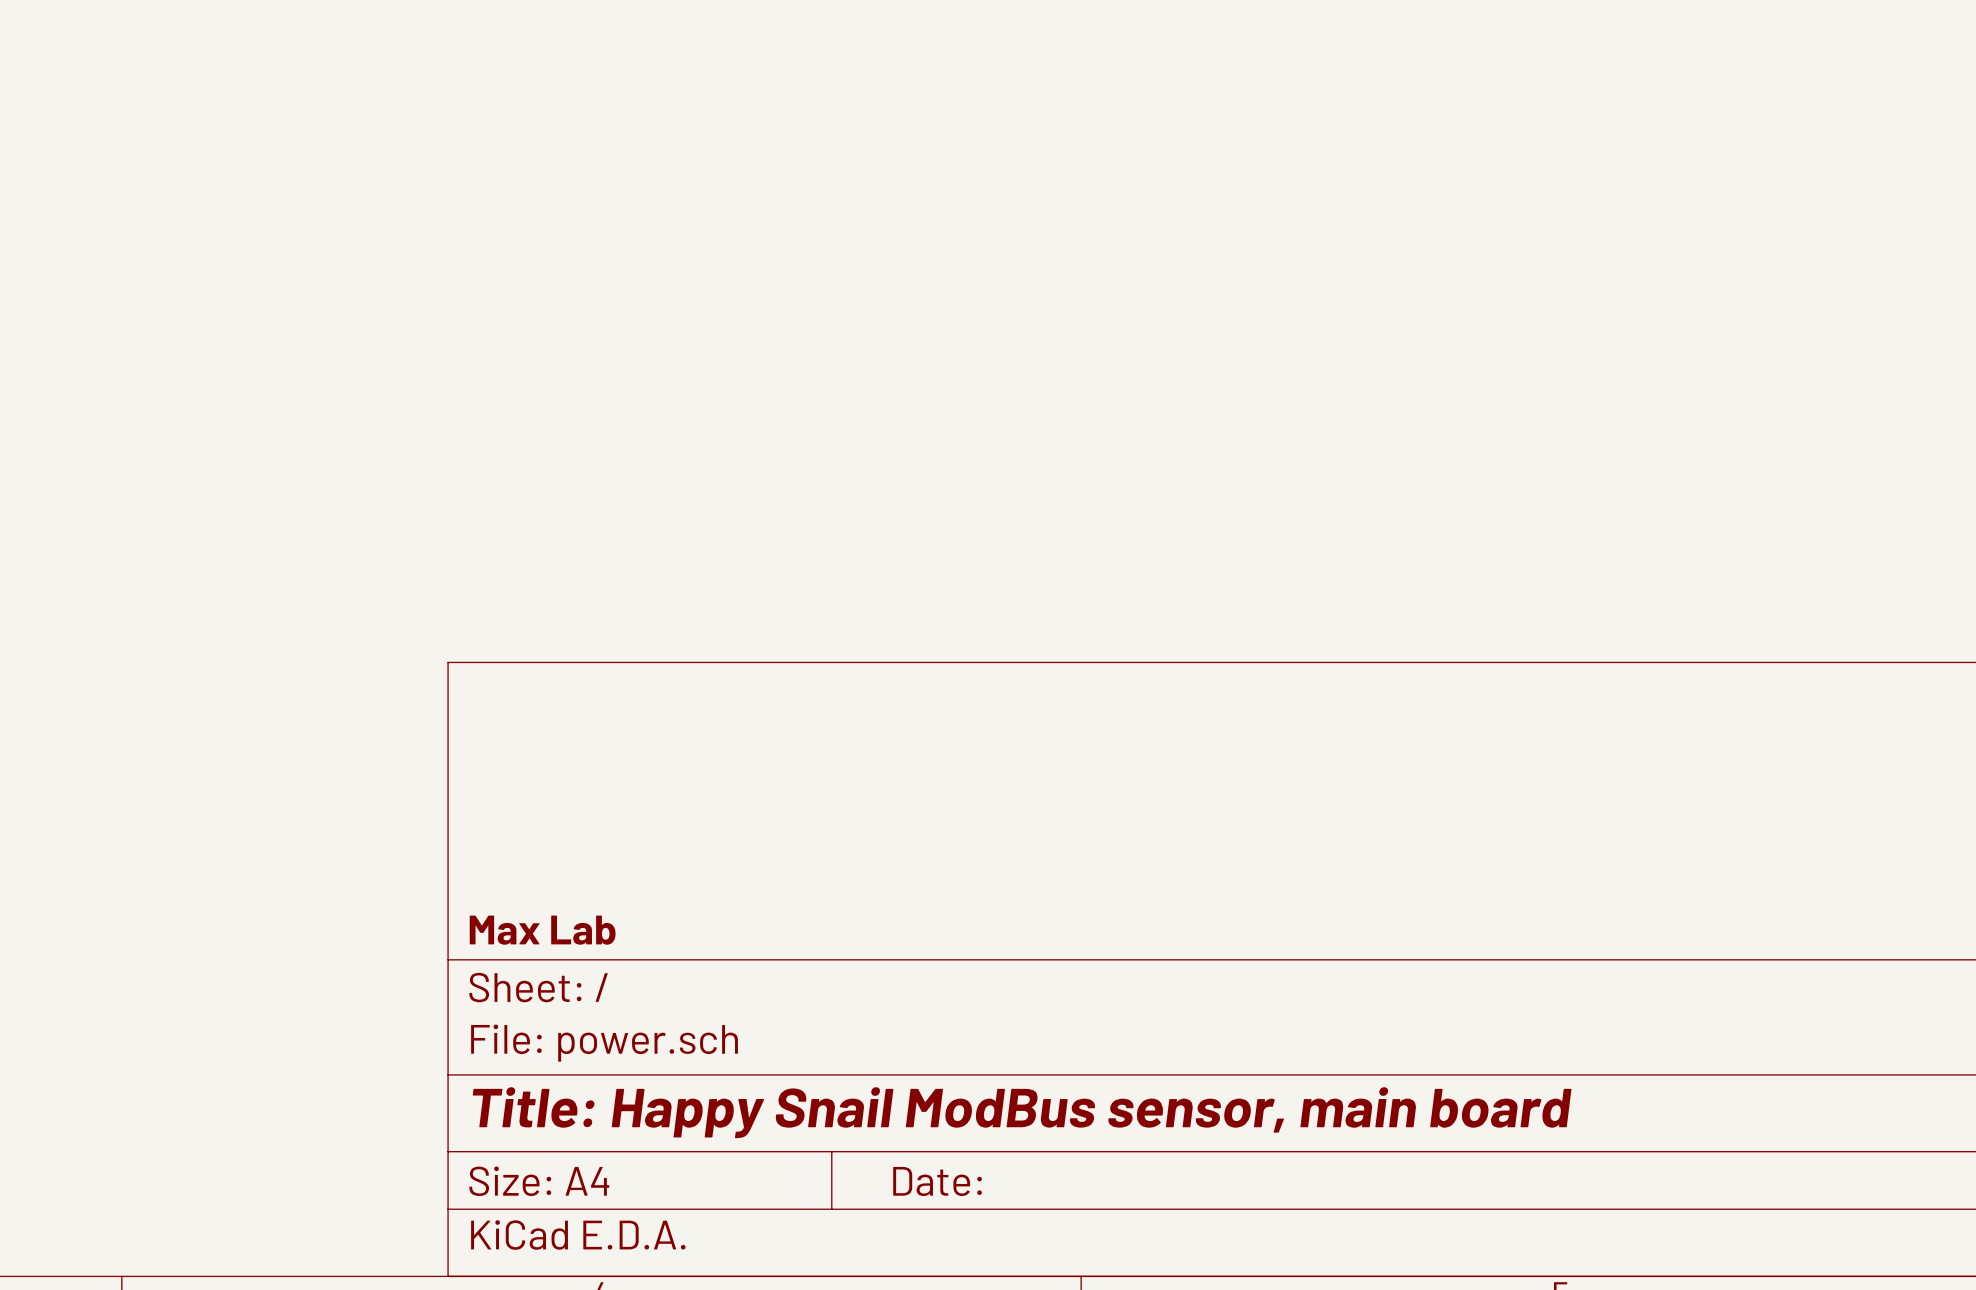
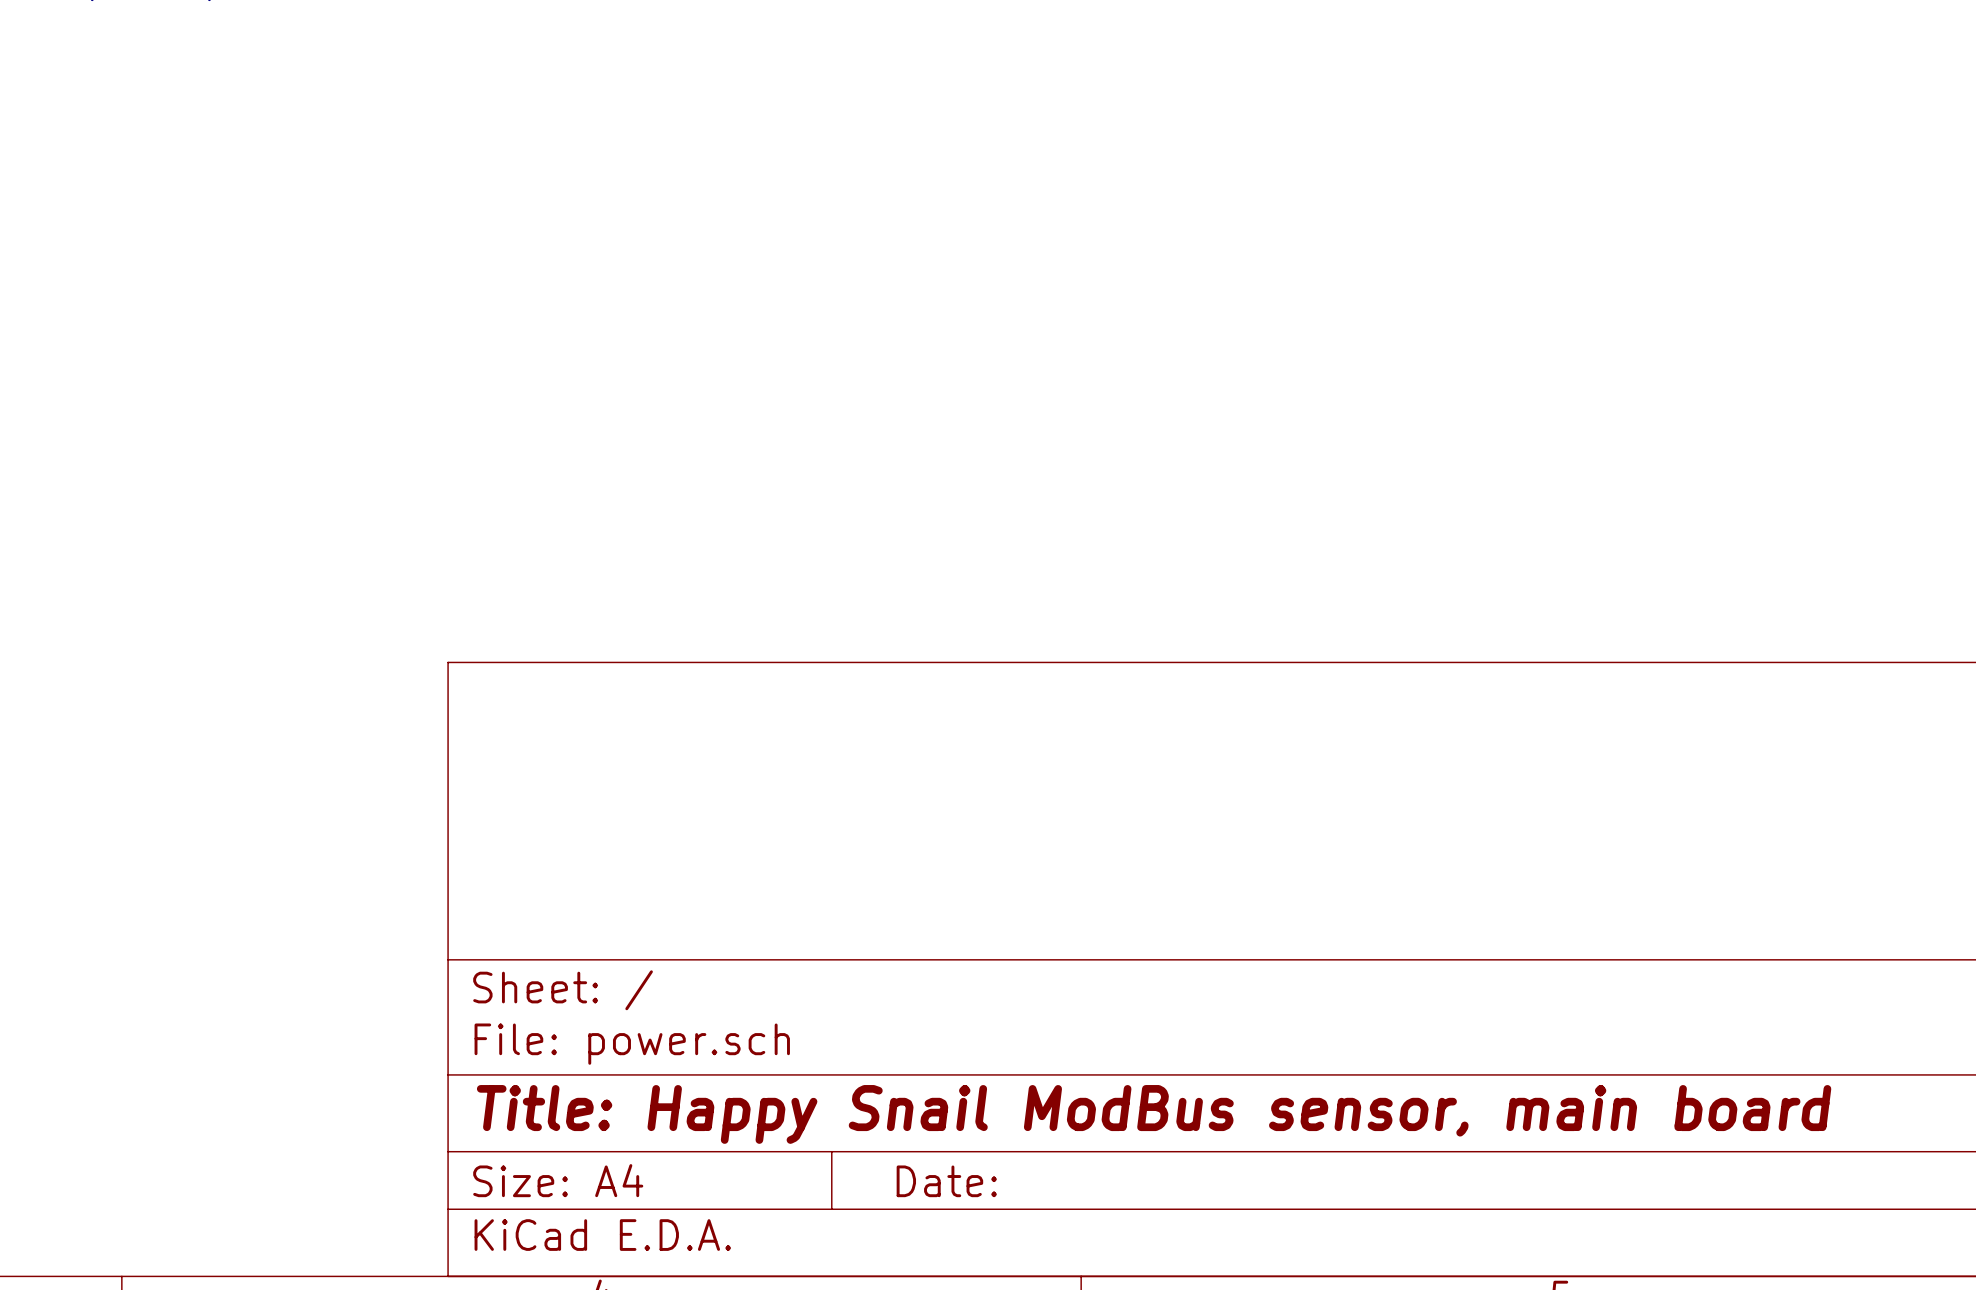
title block: Max Lab (542, 930) -> none

